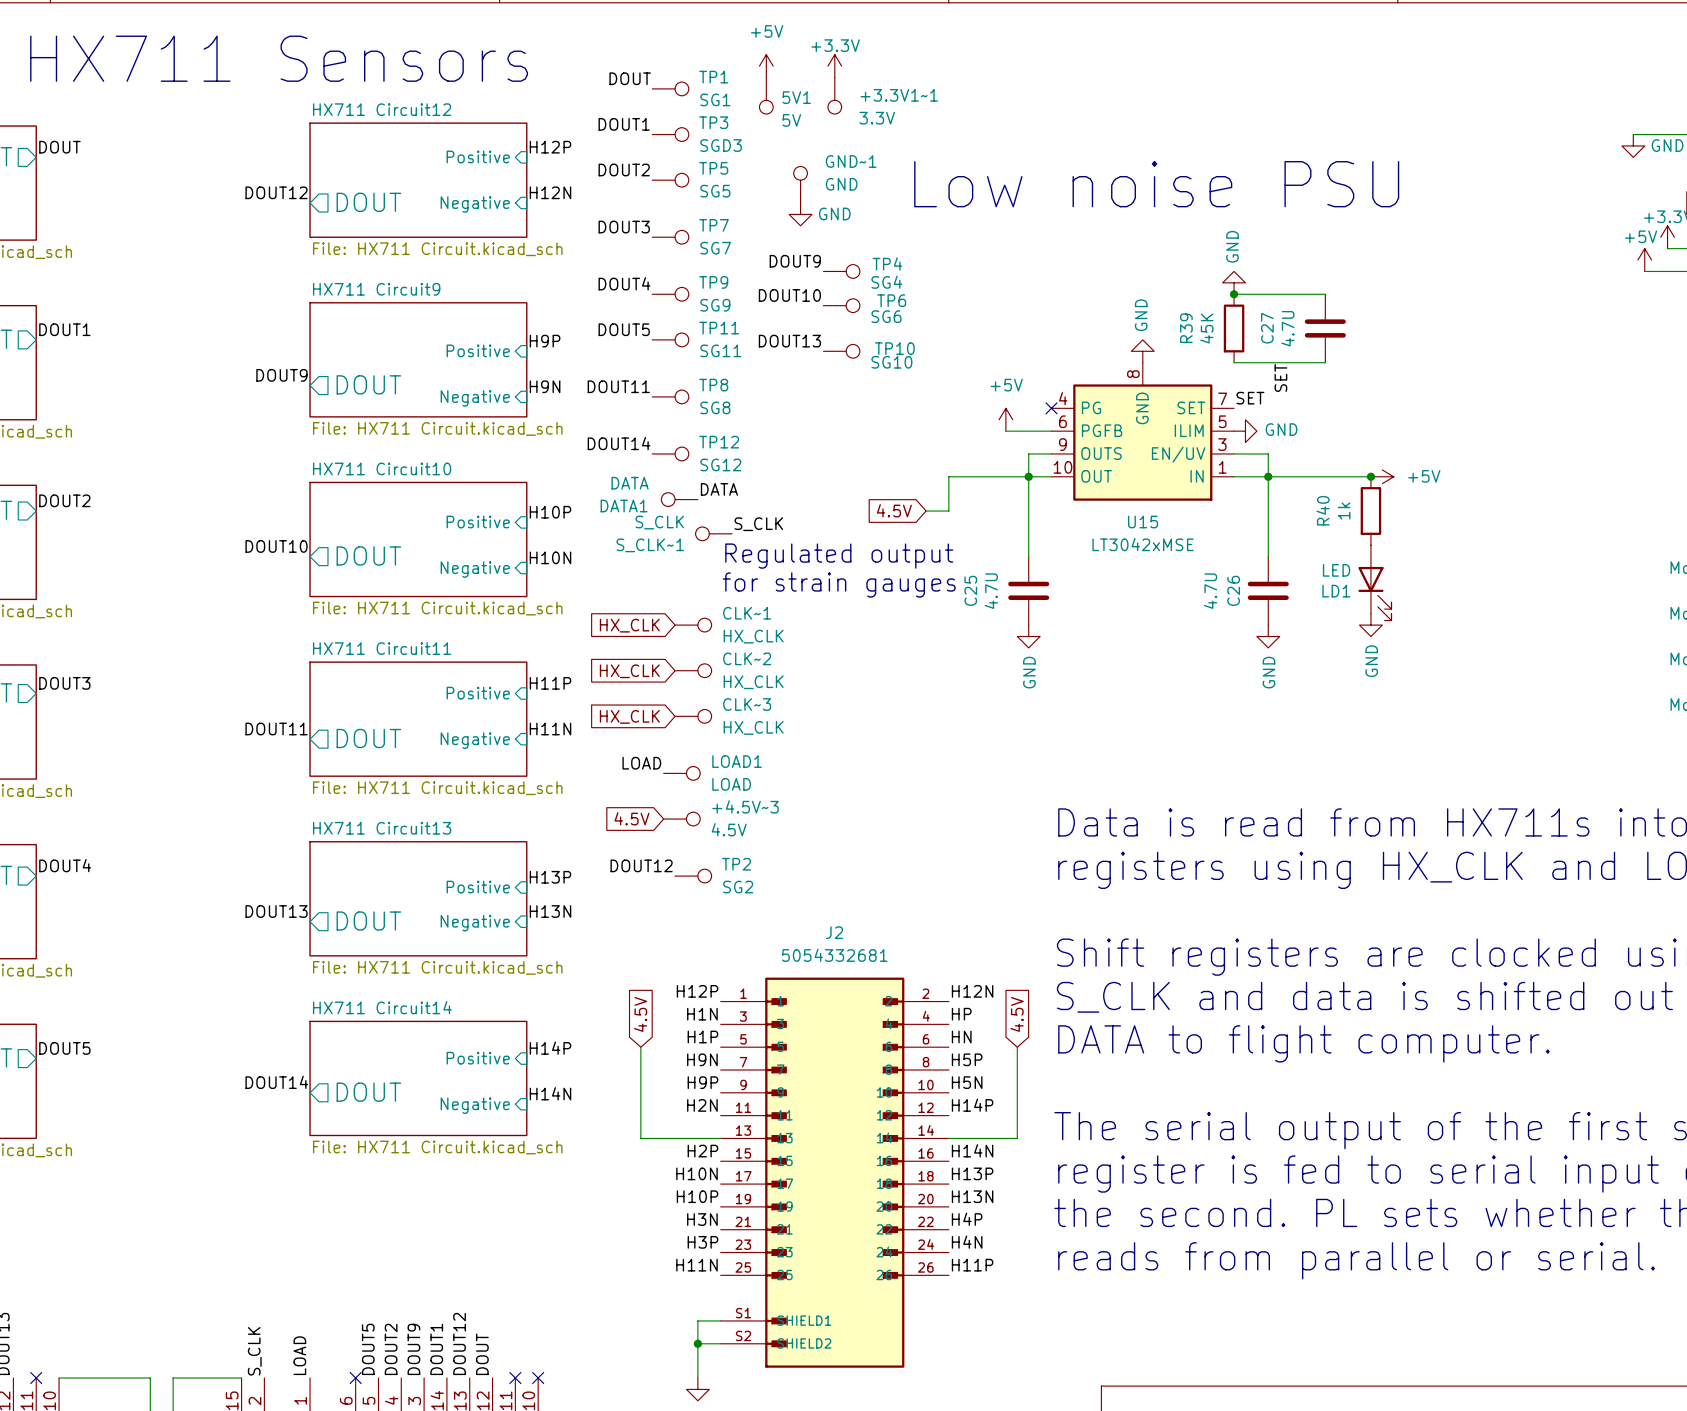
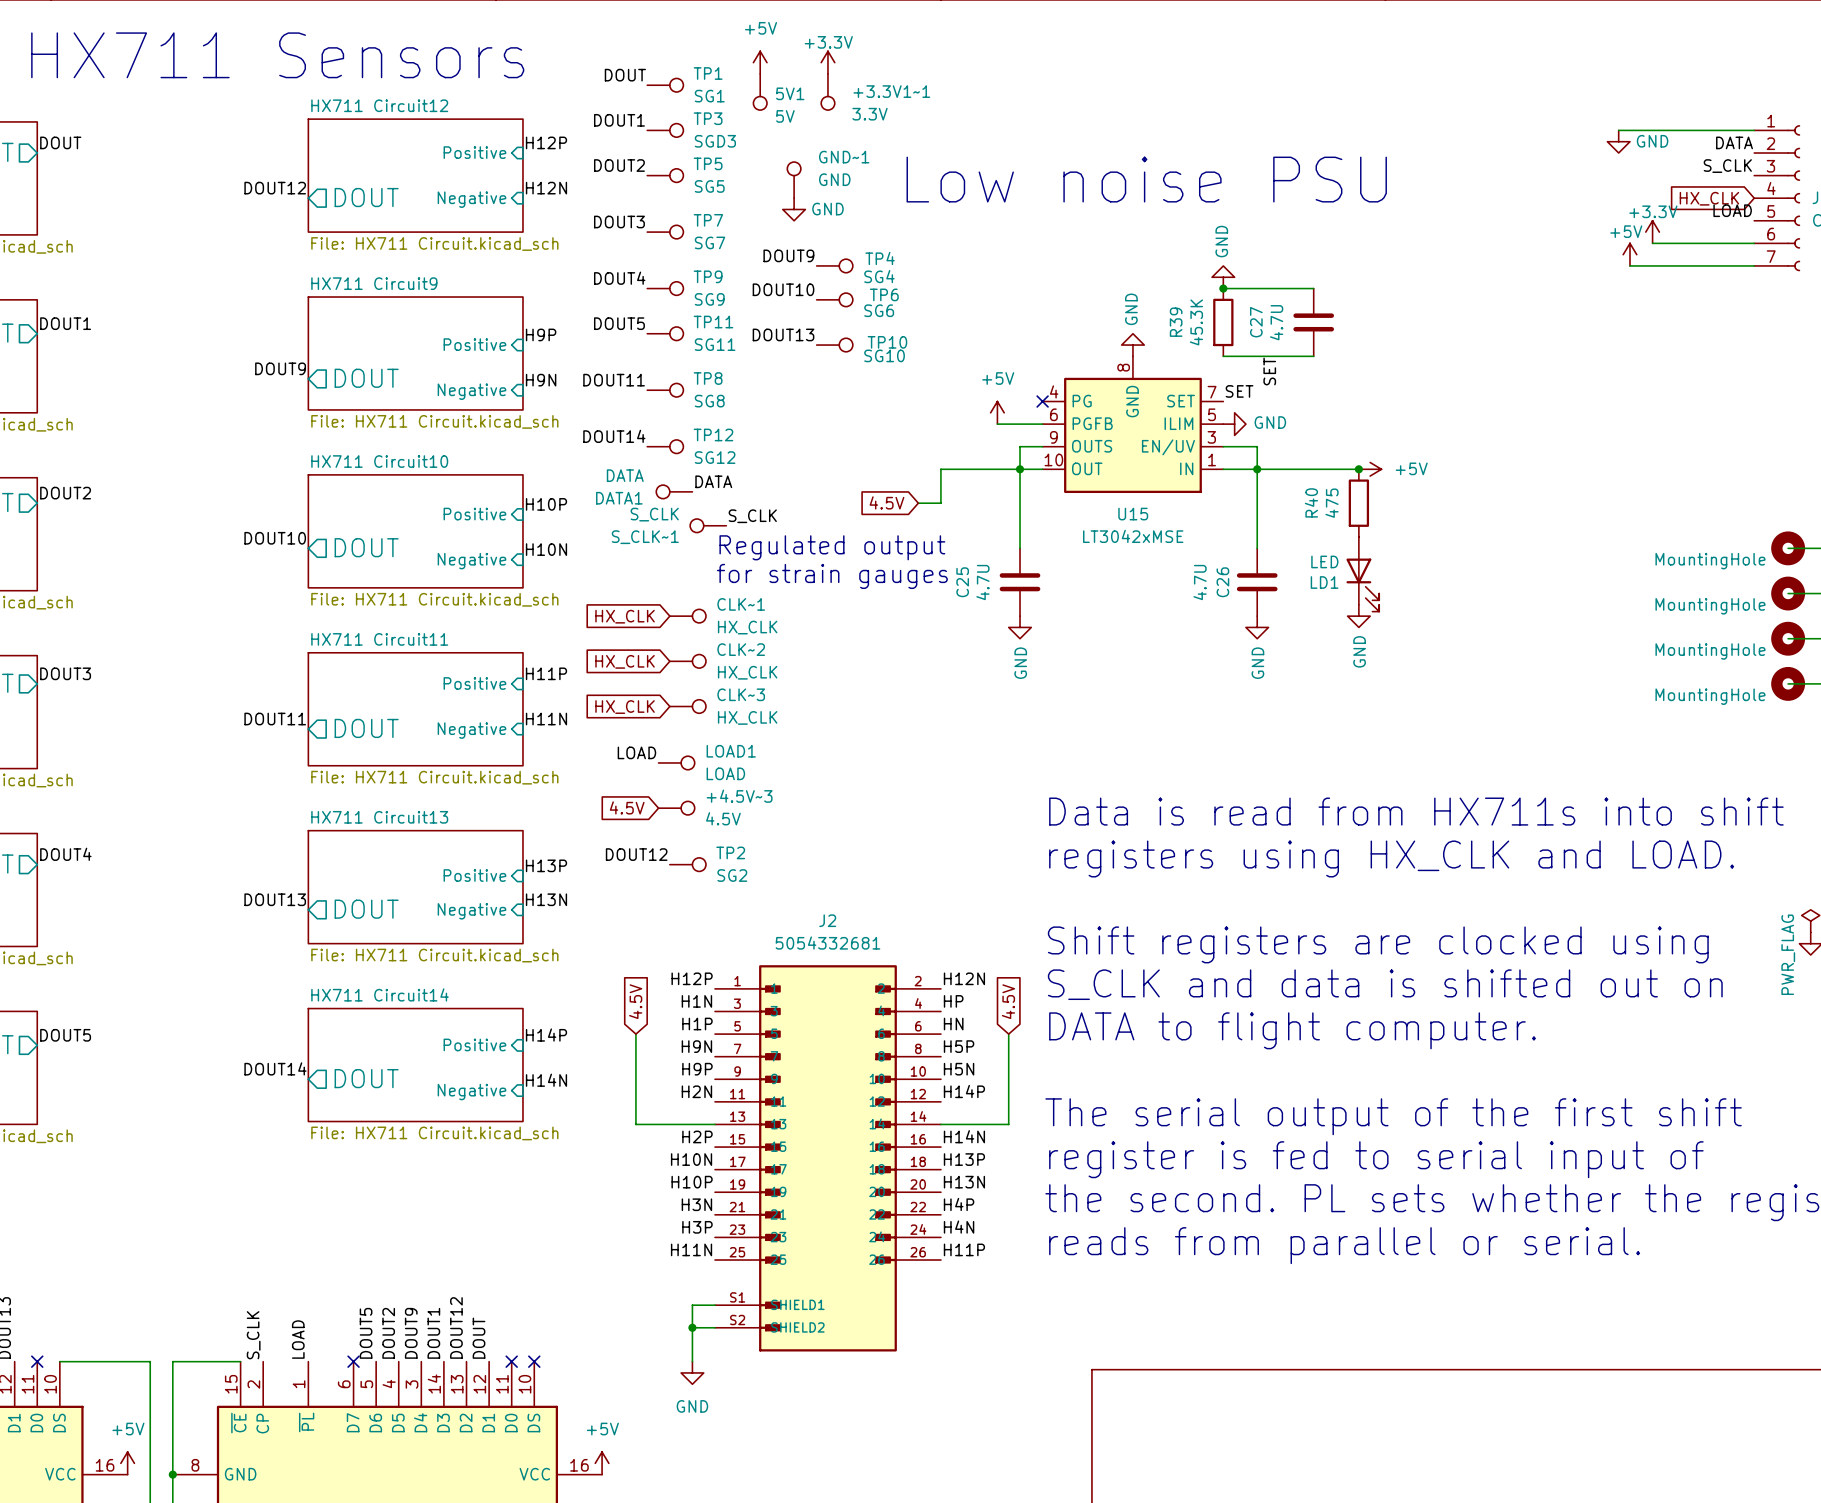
R39 value: 45K (1206, 328) -> 45.3K (1196, 322)
R40 value: 1k (1344, 511) -> 475 (1331, 503)

